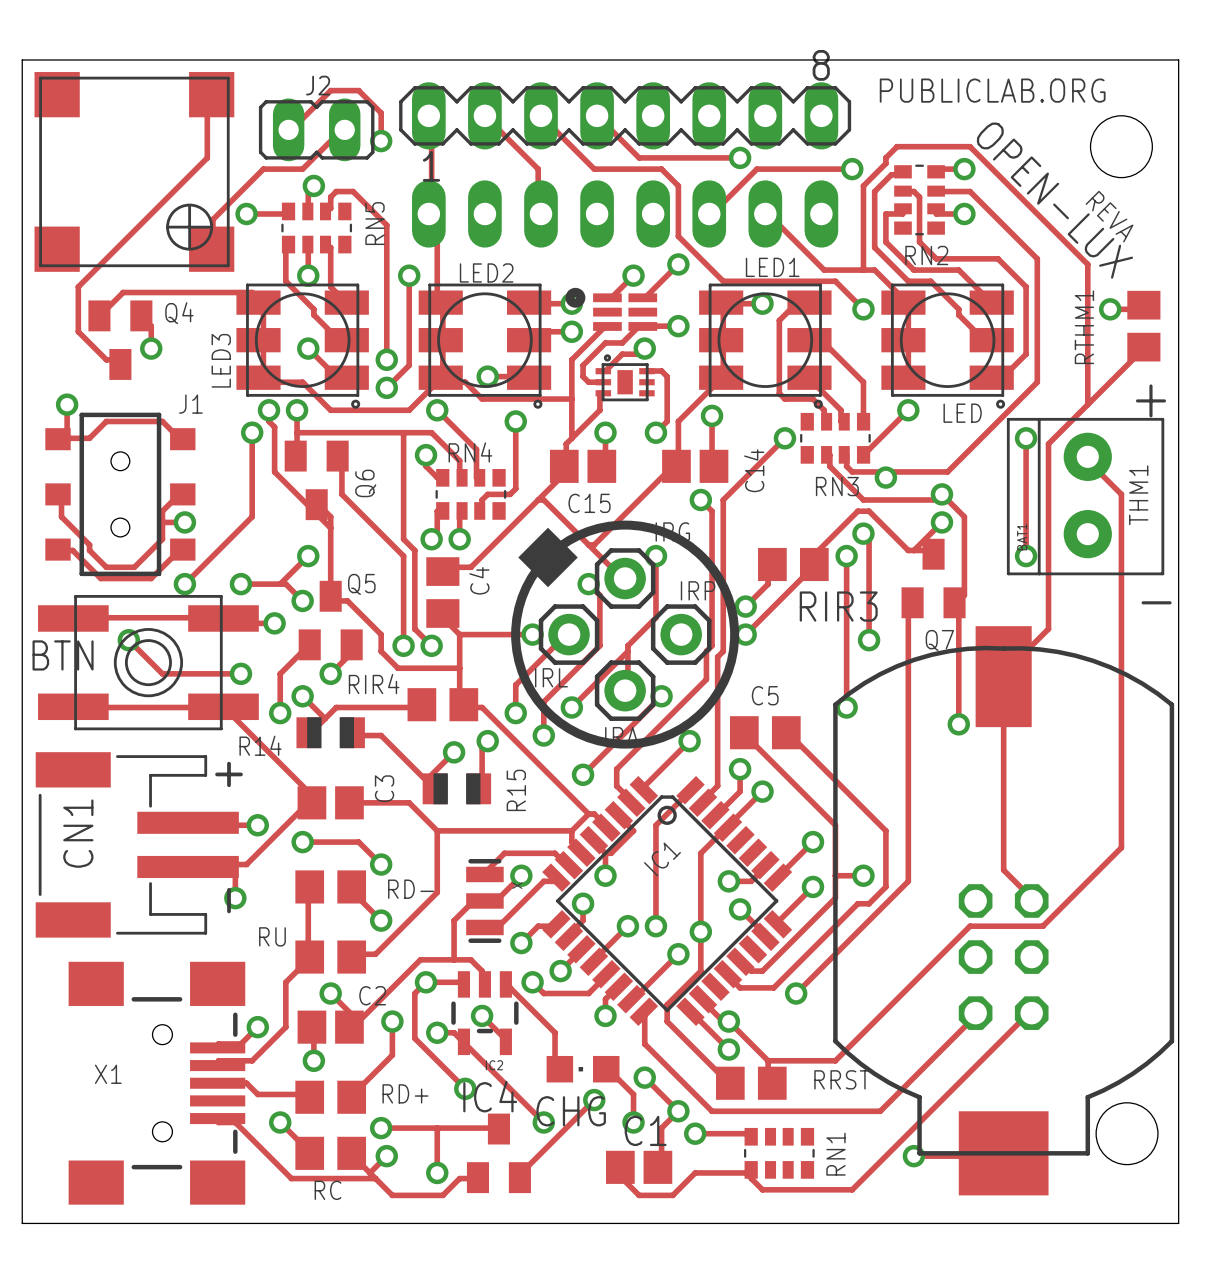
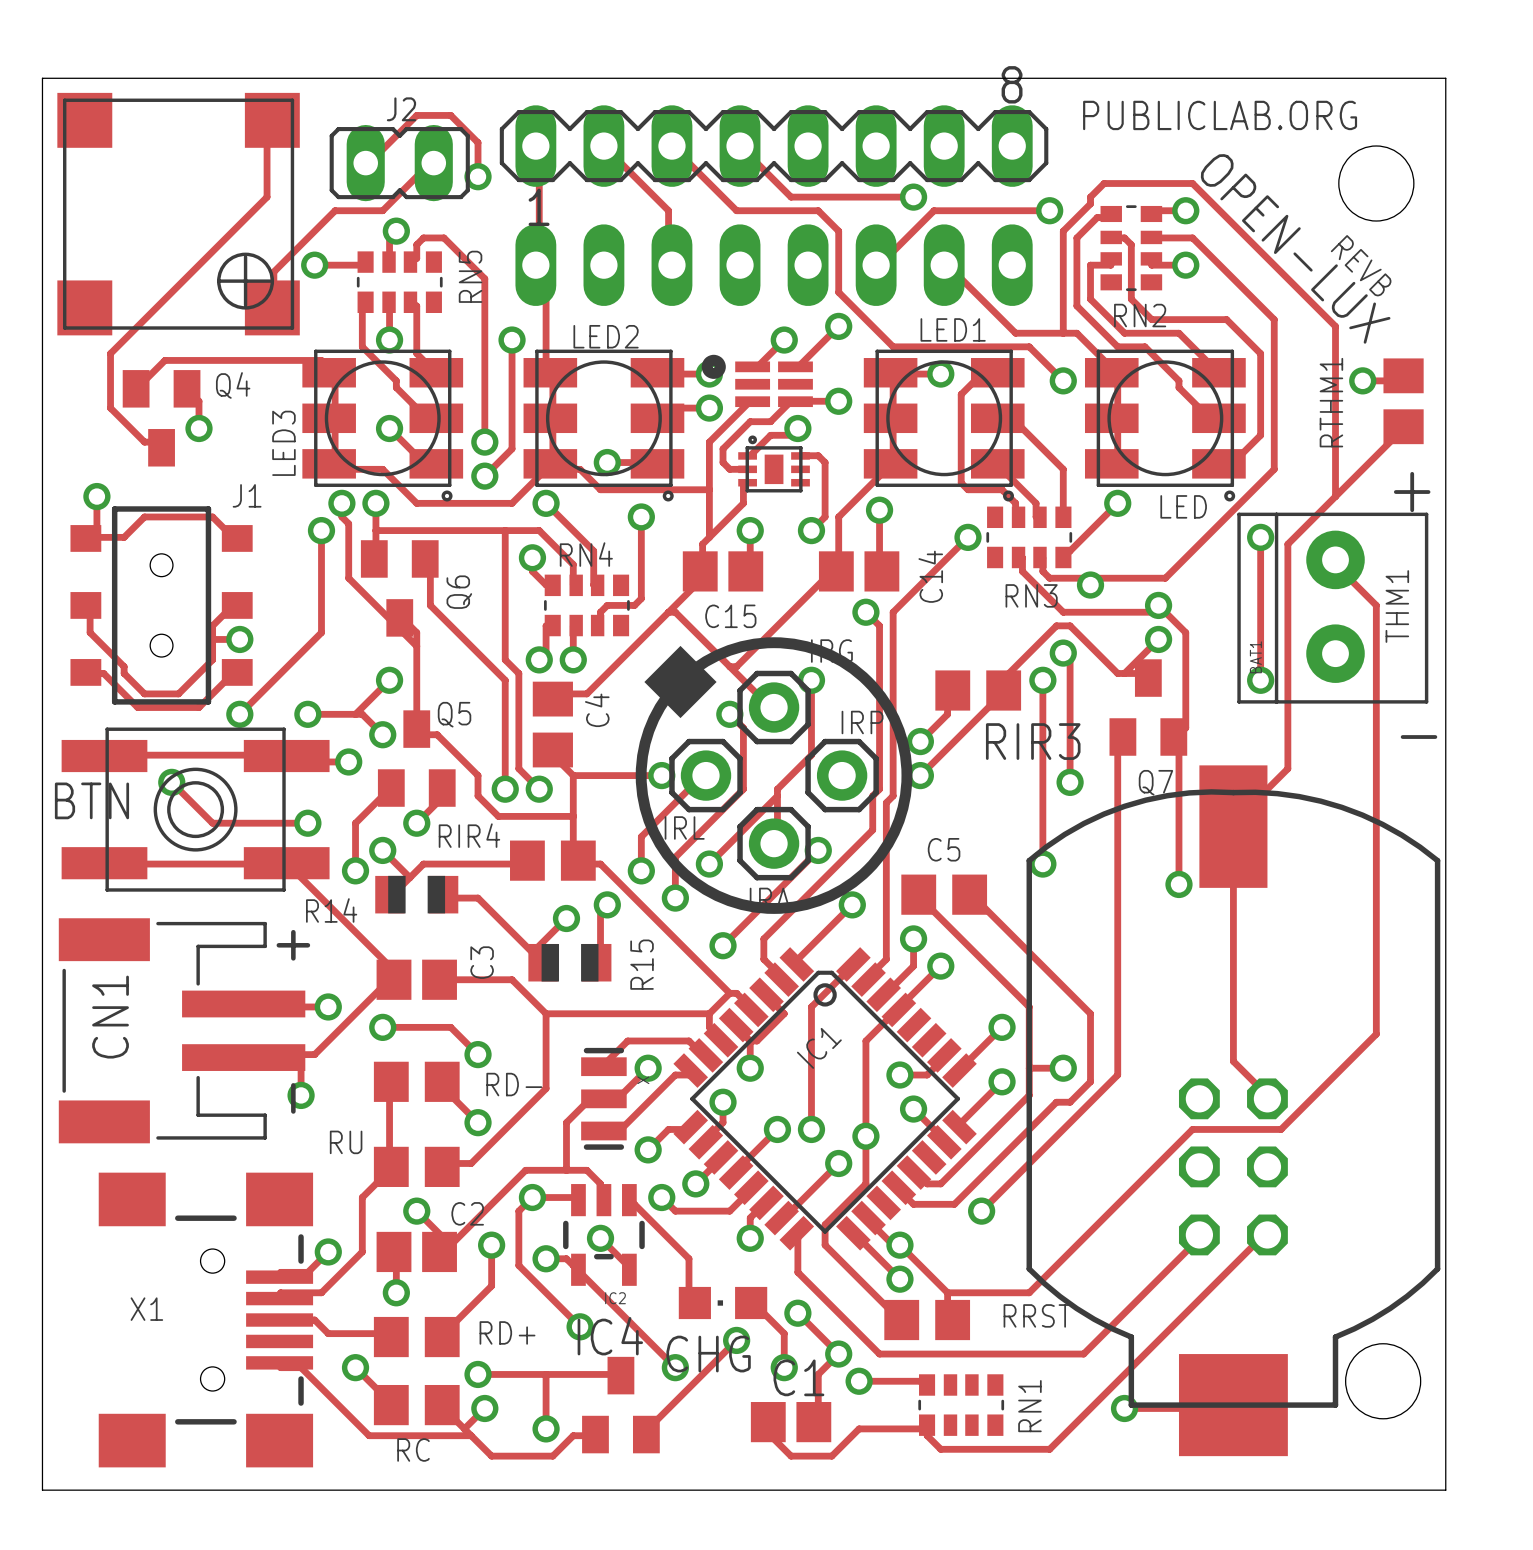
text: REVA (1109, 216) -> REVB (1361, 265)

